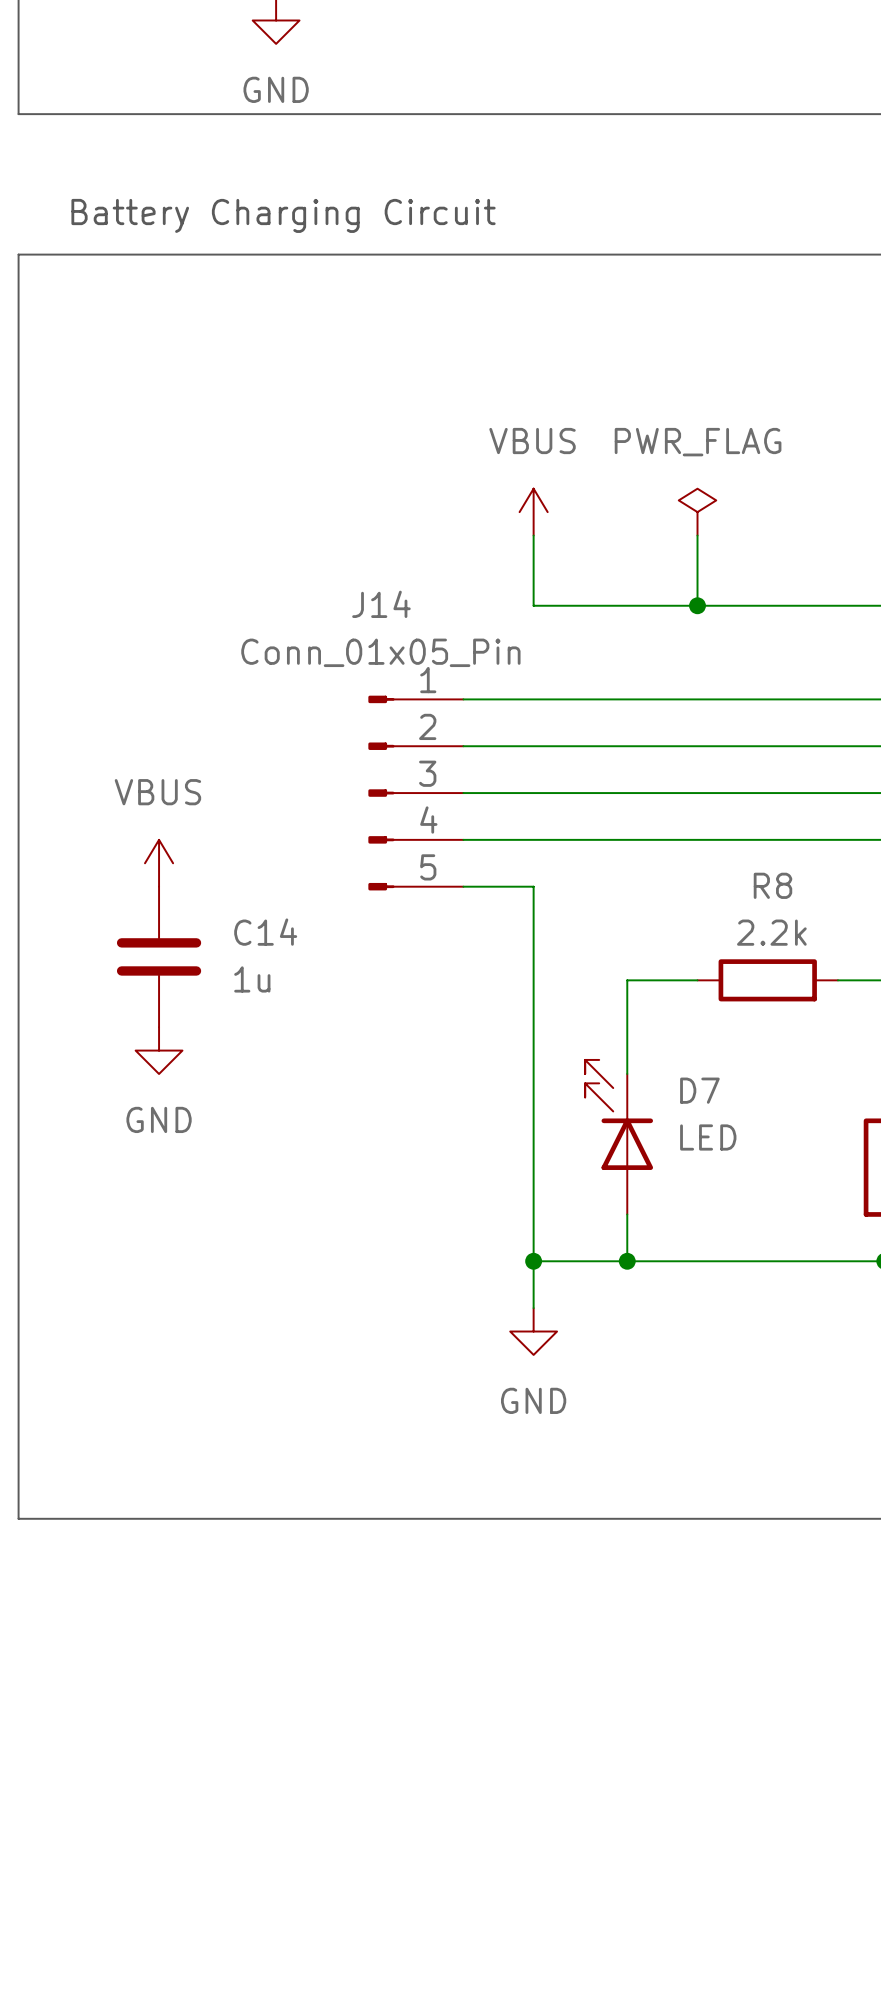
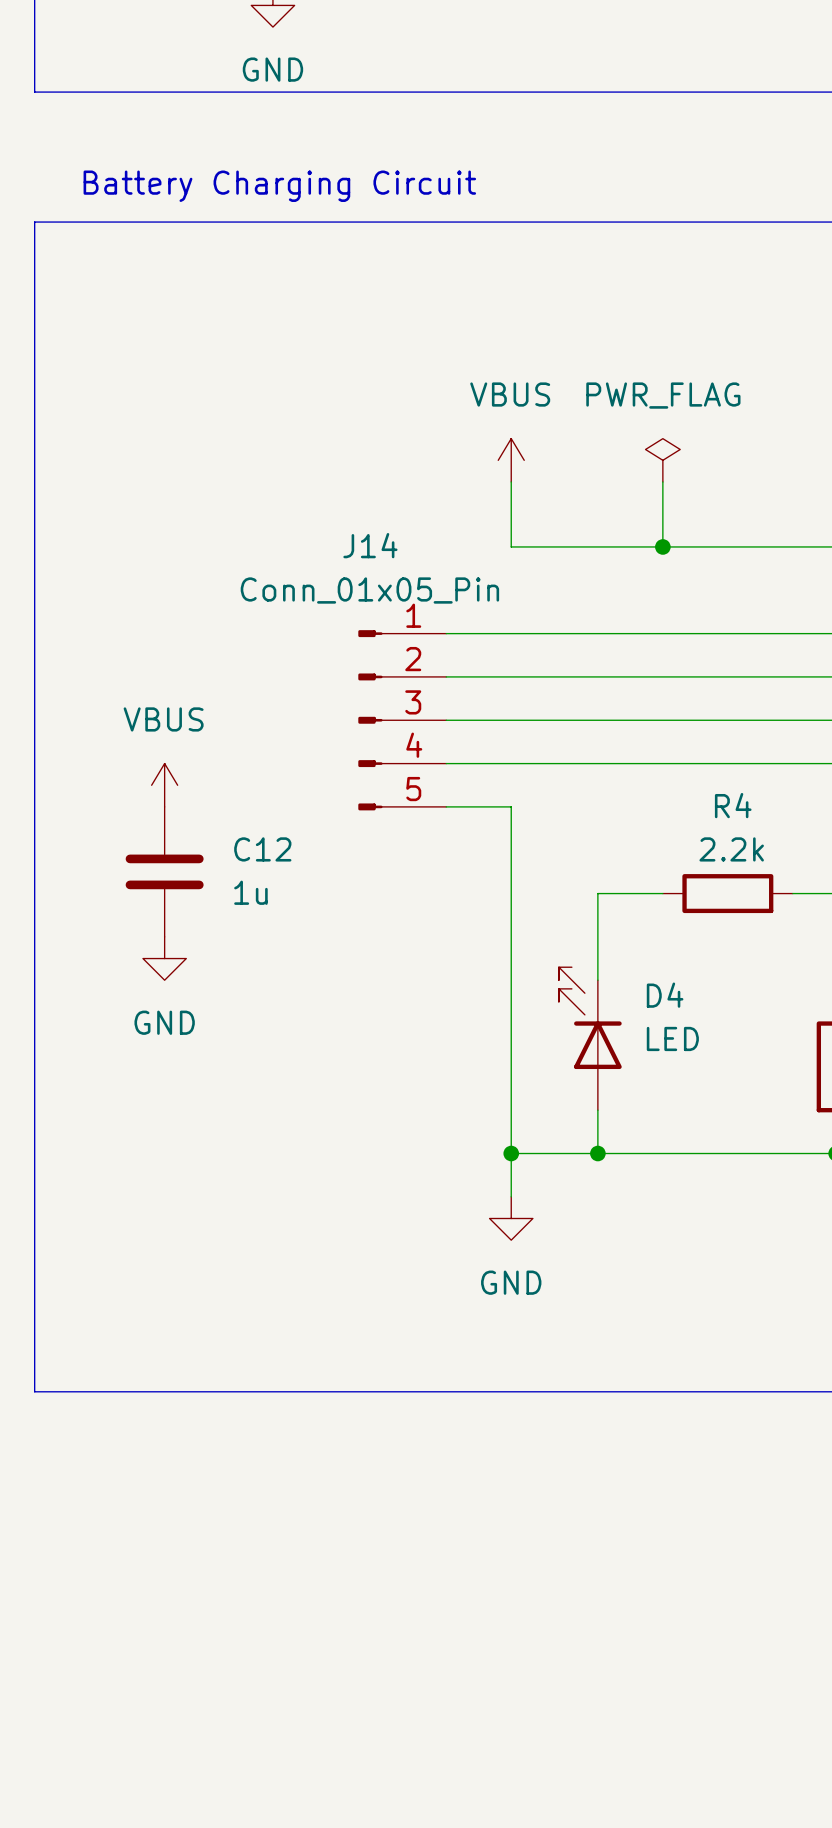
R8 name: R8 (772, 885) -> R4 (733, 805)
C14 name: C14 (265, 932) -> C12 (262, 849)
D7 name: D7 (699, 1090) -> D4 (665, 995)

